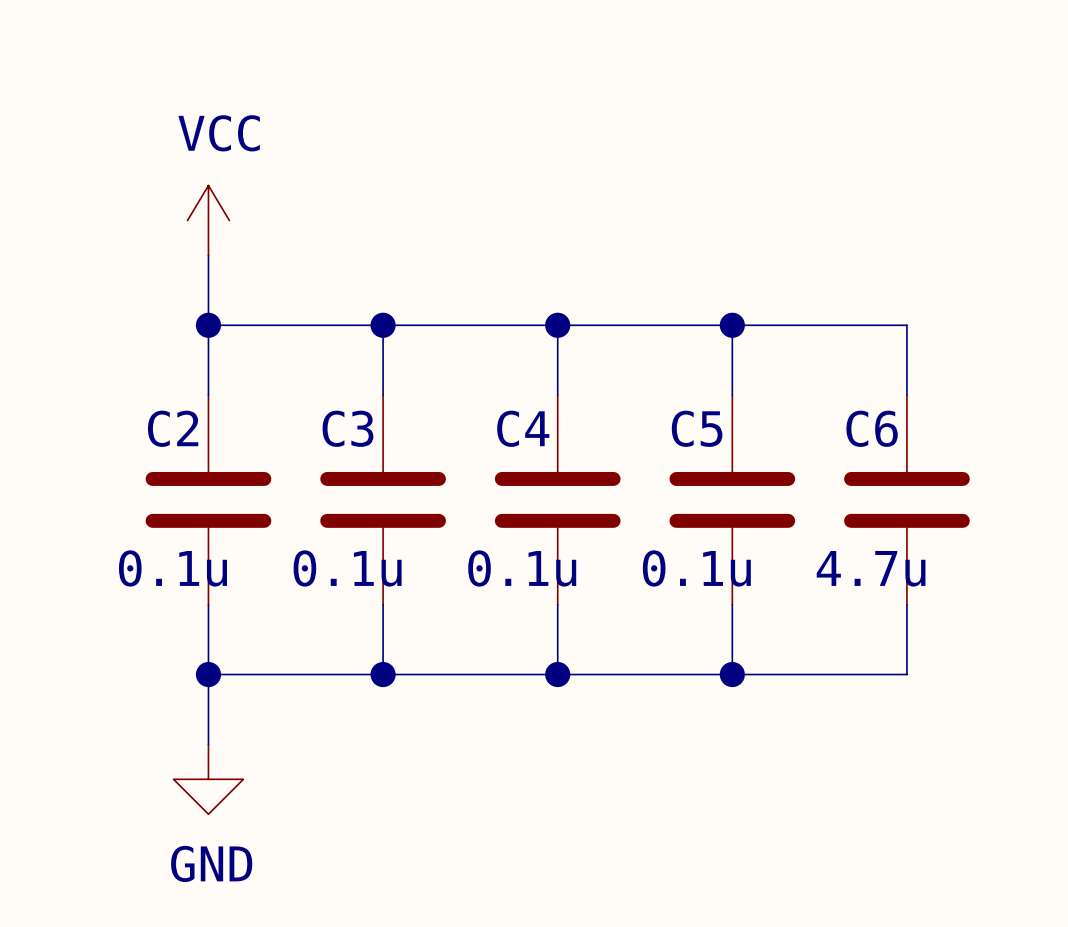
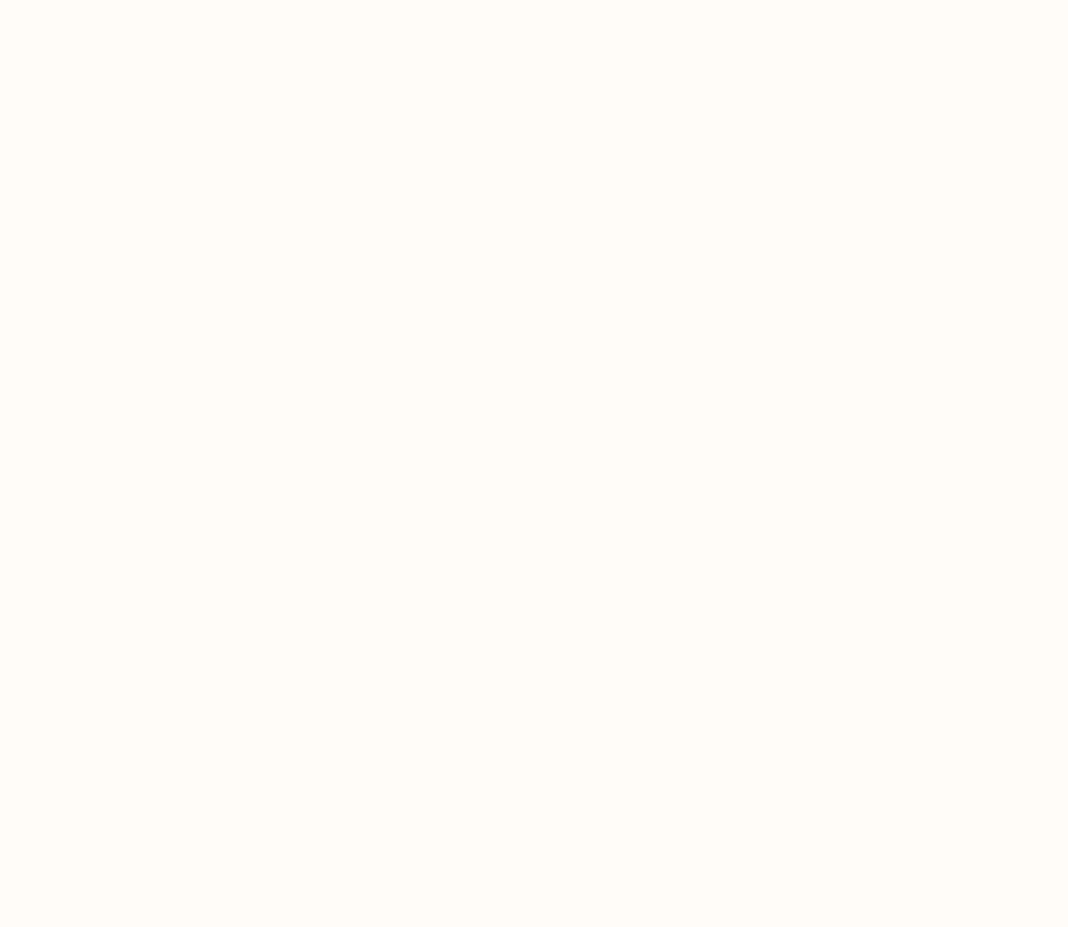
power symbol: VCC (208, 220) -> none
wire: (208, 255) (208, 395) -> none
wire: (208, 325) (906, 325) (906, 395) -> none
junction: (208, 325) -> none
wire: (383, 325) (383, 395) -> none
junction: (383, 325) -> none
wire: (557, 325) (557, 395) -> none
junction: (557, 325) -> none
wire: (732, 325) (732, 395) -> none
junction: (732, 325) -> none
C2: 0.1u (208, 499) -> none
C3: 0.1u (383, 499) -> none
C4: 0.1u (557, 499) -> none
C5: 0.1u (732, 499) -> none
C6: 4.7u (906, 499) -> none
wire: (208, 604) (208, 744) -> none
wire: (383, 604) (383, 674) -> none
wire: (557, 604) (557, 674) -> none
wire: (732, 604) (732, 674) -> none
wire: (906, 604) (906, 674) (208, 674) -> none
junction: (208, 674) -> none
junction: (383, 674) -> none
junction: (557, 674) -> none
junction: (732, 674) -> none
power symbol: GND (208, 779) -> none

